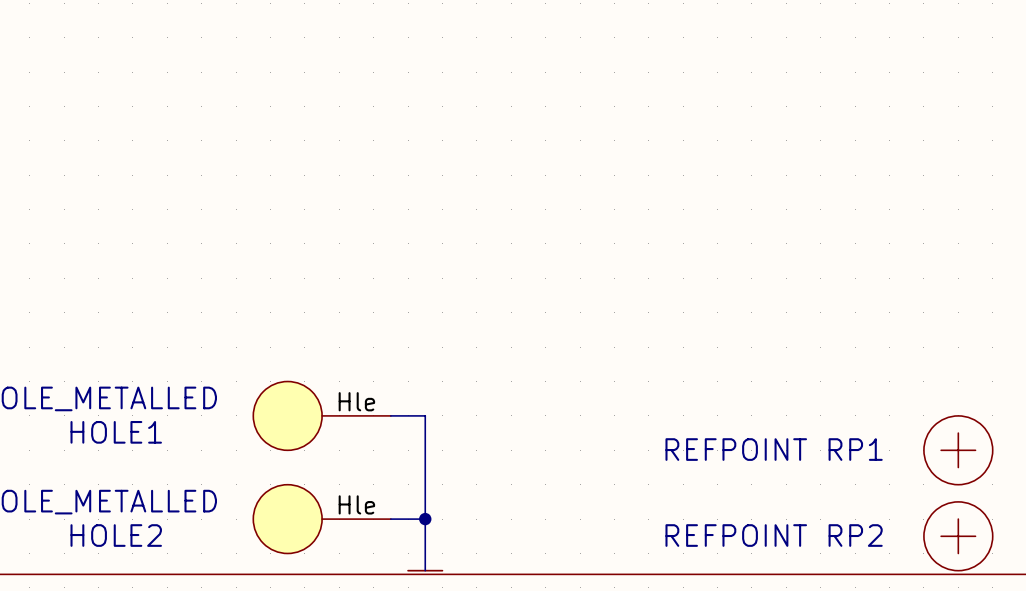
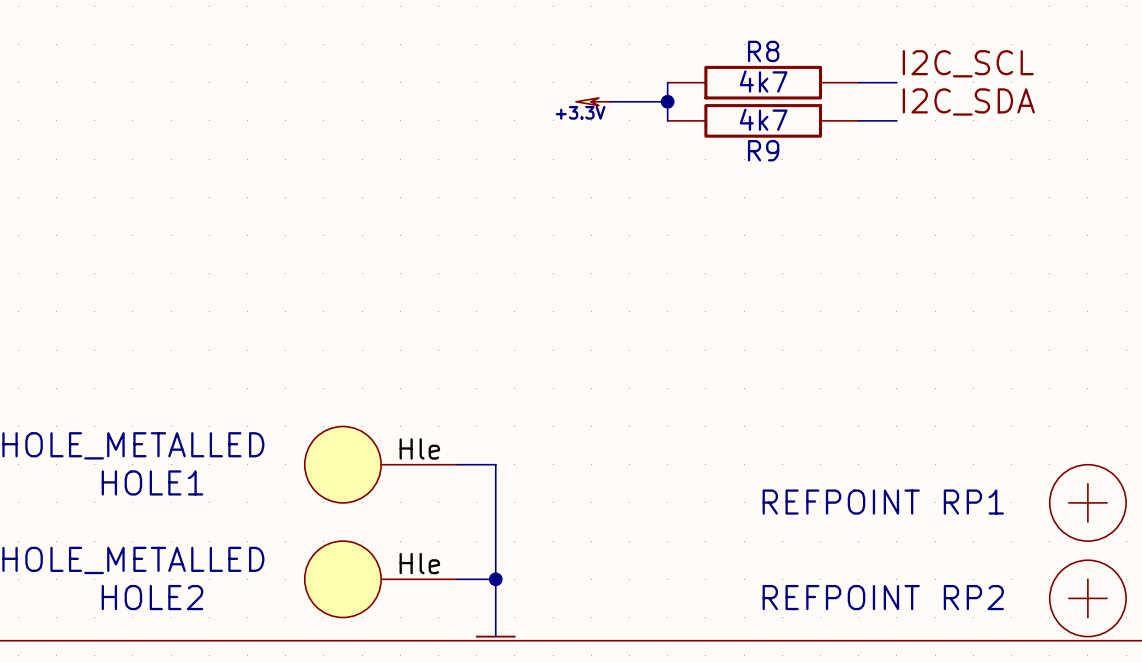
label: none -> I2C_SCL (968, 63)
wire: none -> (667, 82) (667, 120)
R8: none -> 4k7 (763, 82)
wire: none -> (858, 82) (896, 82)
power symbol: none -> +3.3V (593, 101)
wire: none -> (610, 101) (667, 101)
junction: none -> (667, 101)
label: none -> I2C_SDA (968, 101)
R9: none -> 4k7 (763, 120)
wire: none -> (858, 120) (896, 120)

